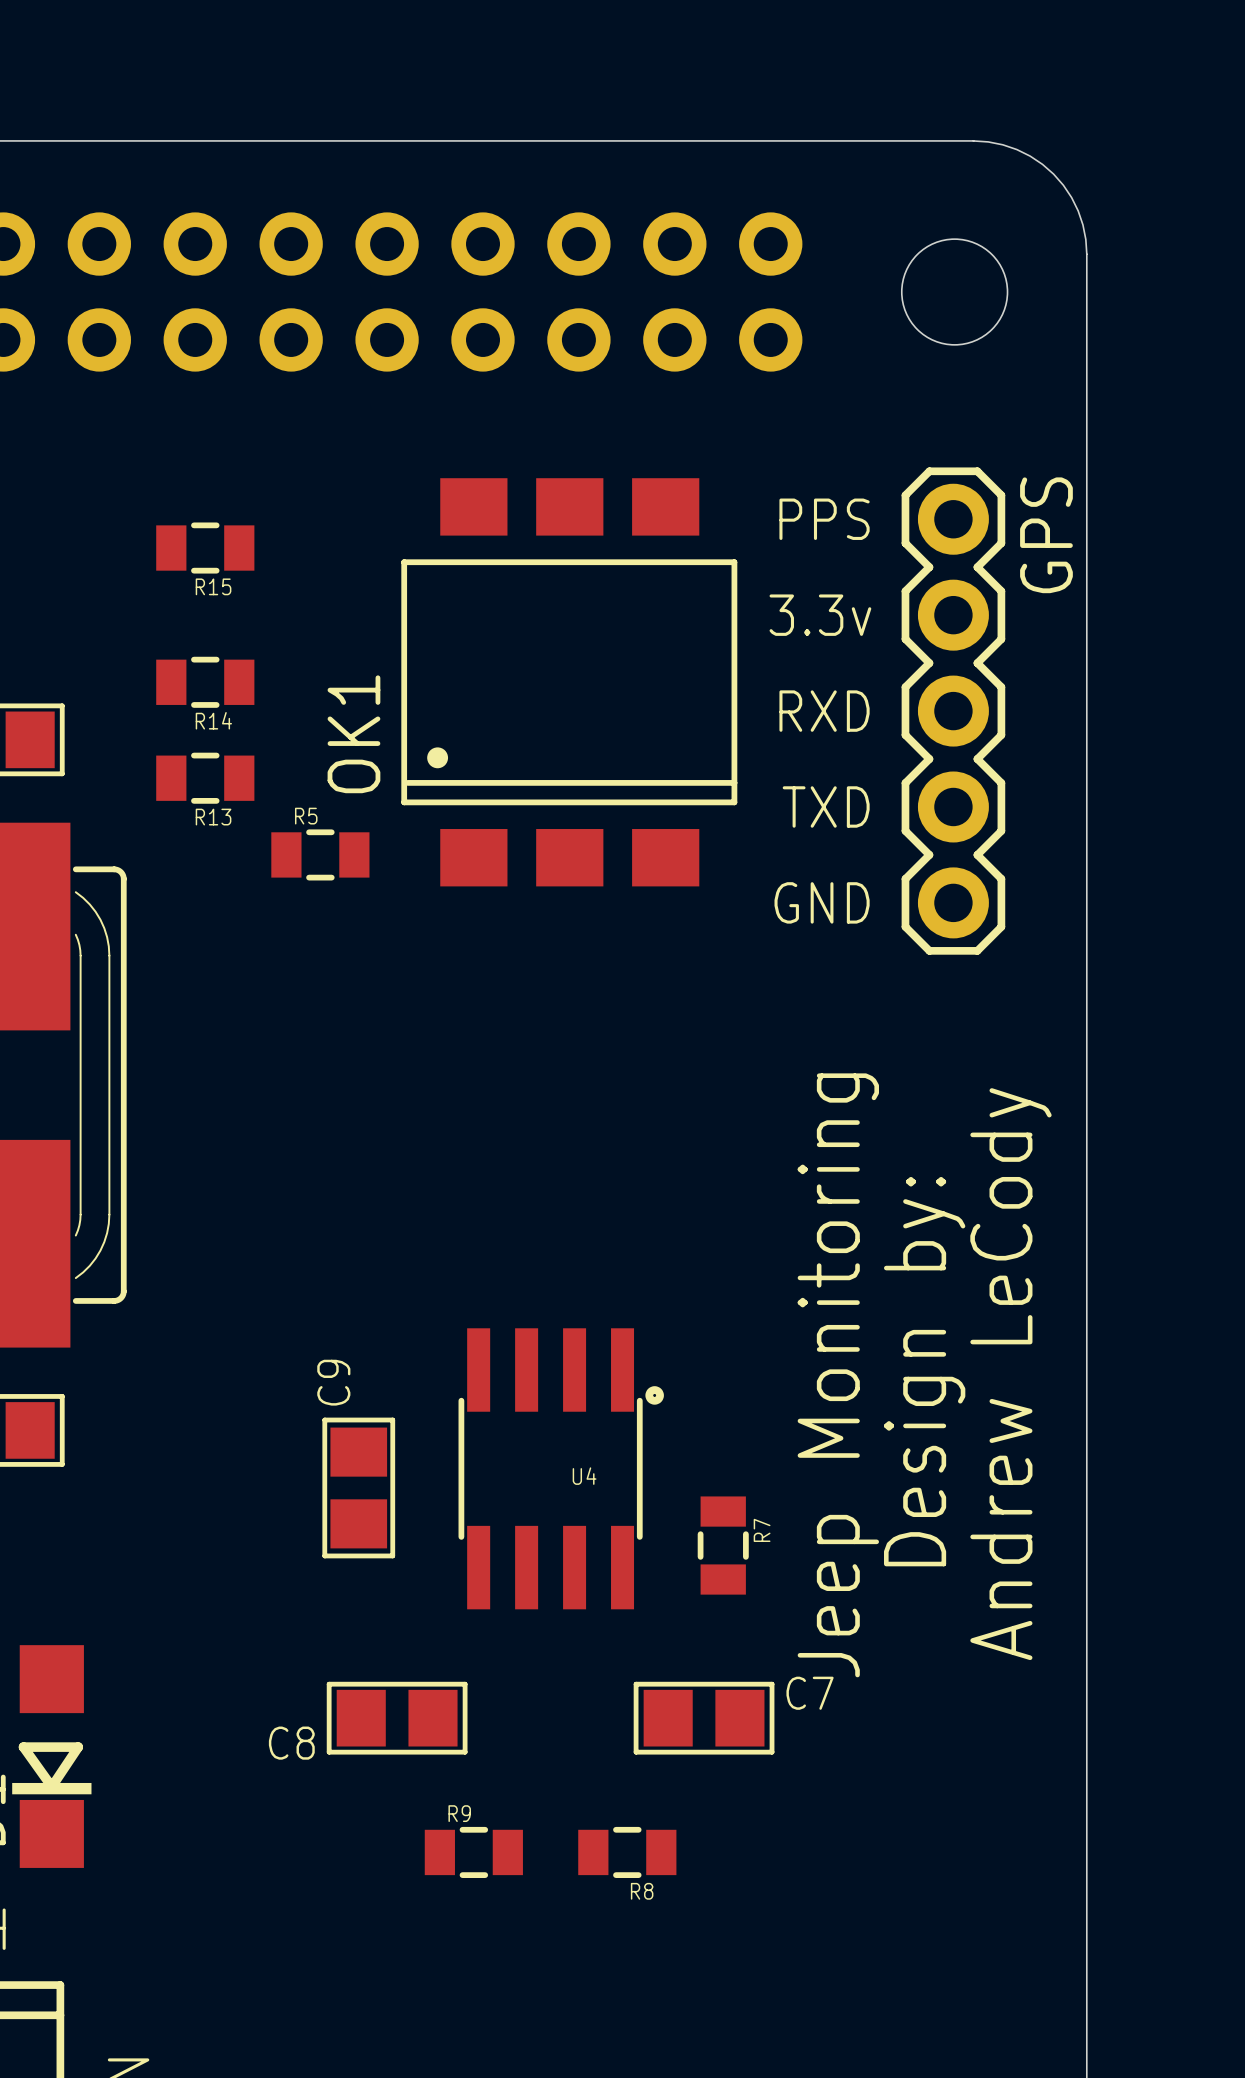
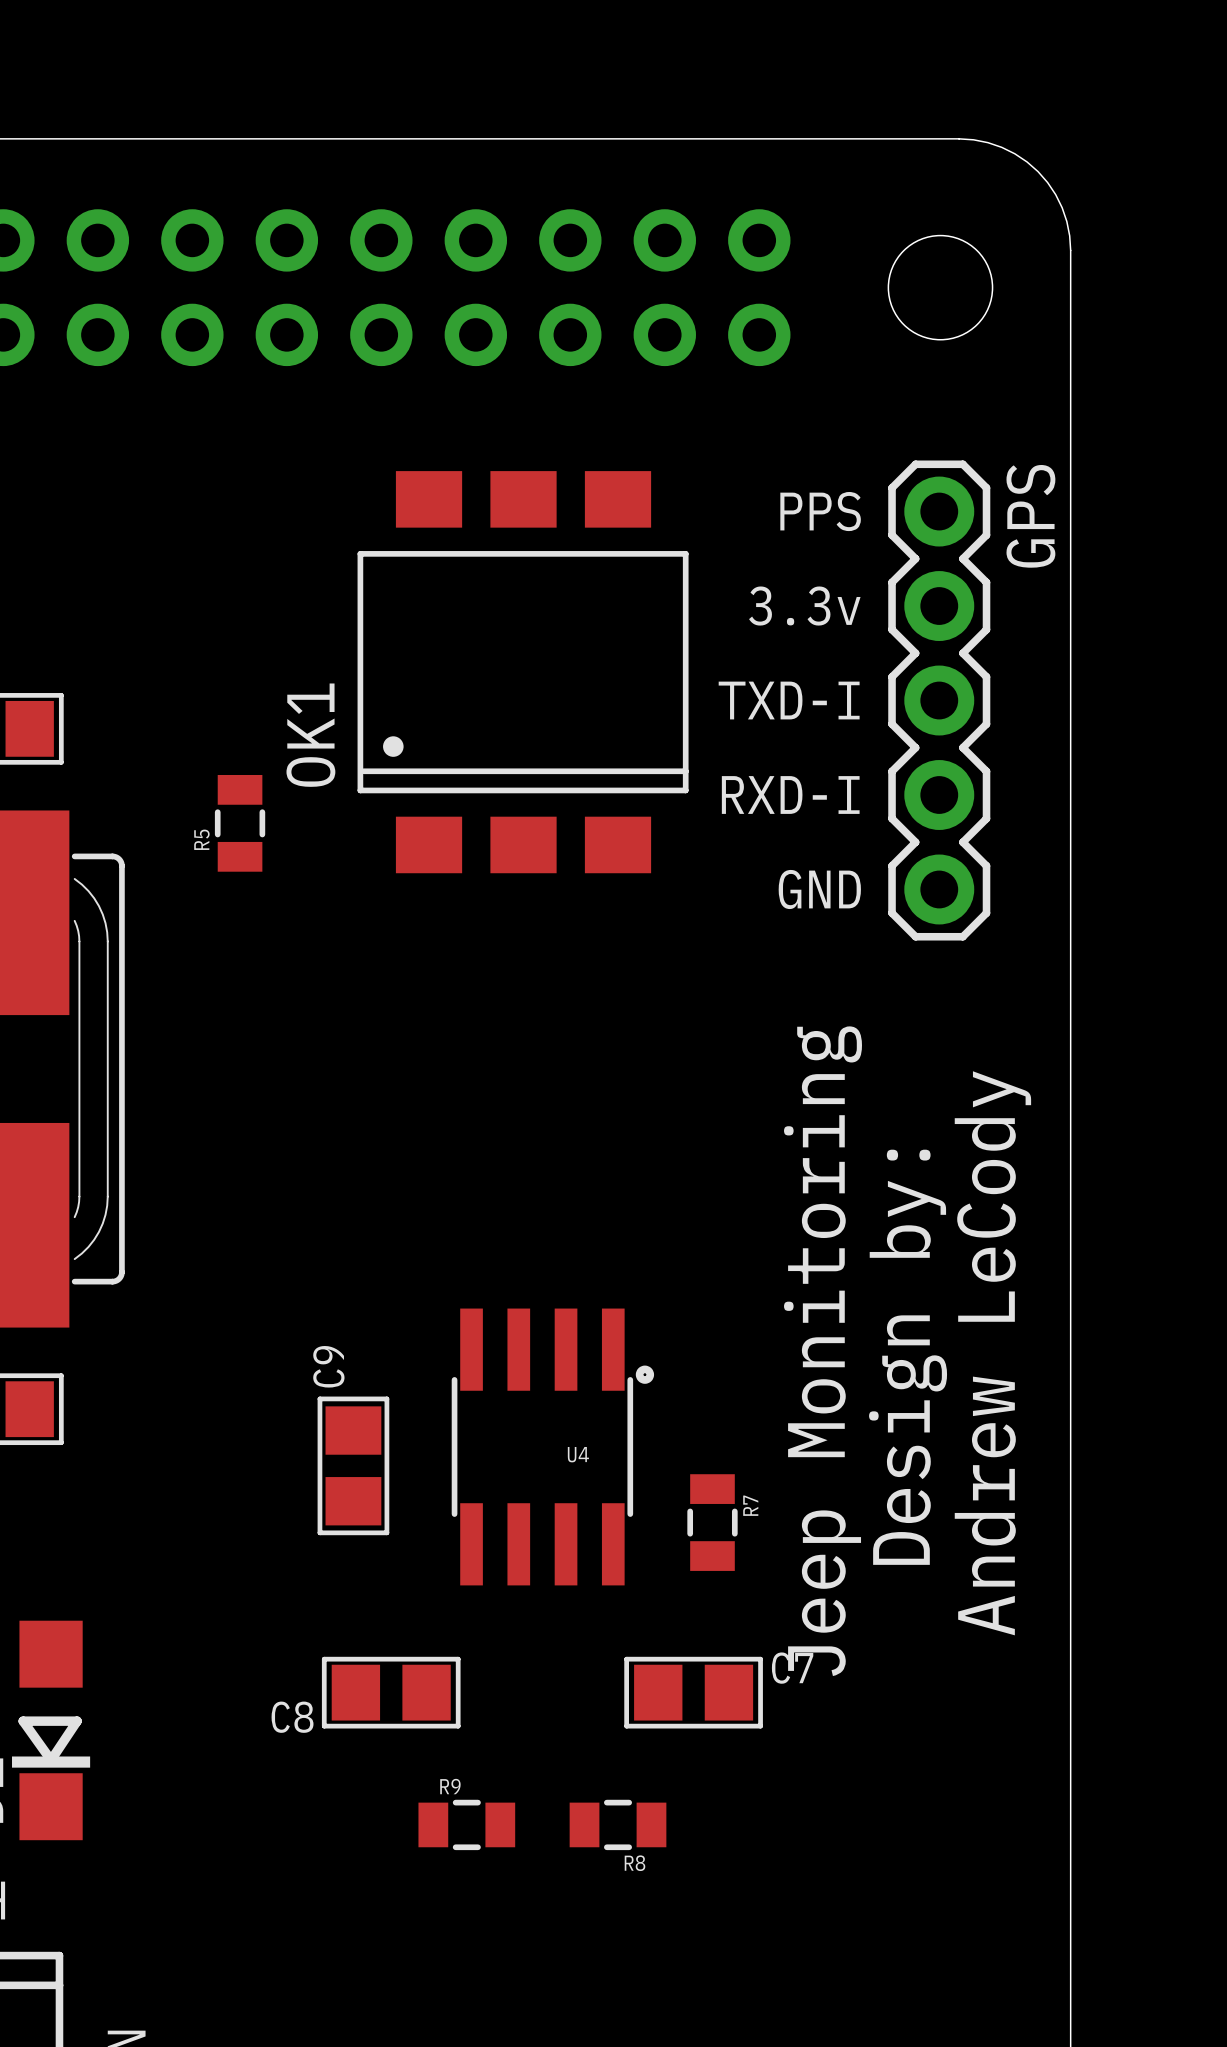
R15: (205, 548) -> none
R14: (205, 682) -> none
OK1 position: (569, 682) -> (523, 672)
text: RXD (824, 711) -> TXD-I (789, 700)
R13: (205, 778) -> none
text: TXD (826, 806) -> RXD-I (790, 795)
R5 rotation: 0° (320, 854) -> 90° clockwise (240, 823)
R5 position: (320, 854) -> (240, 823)

